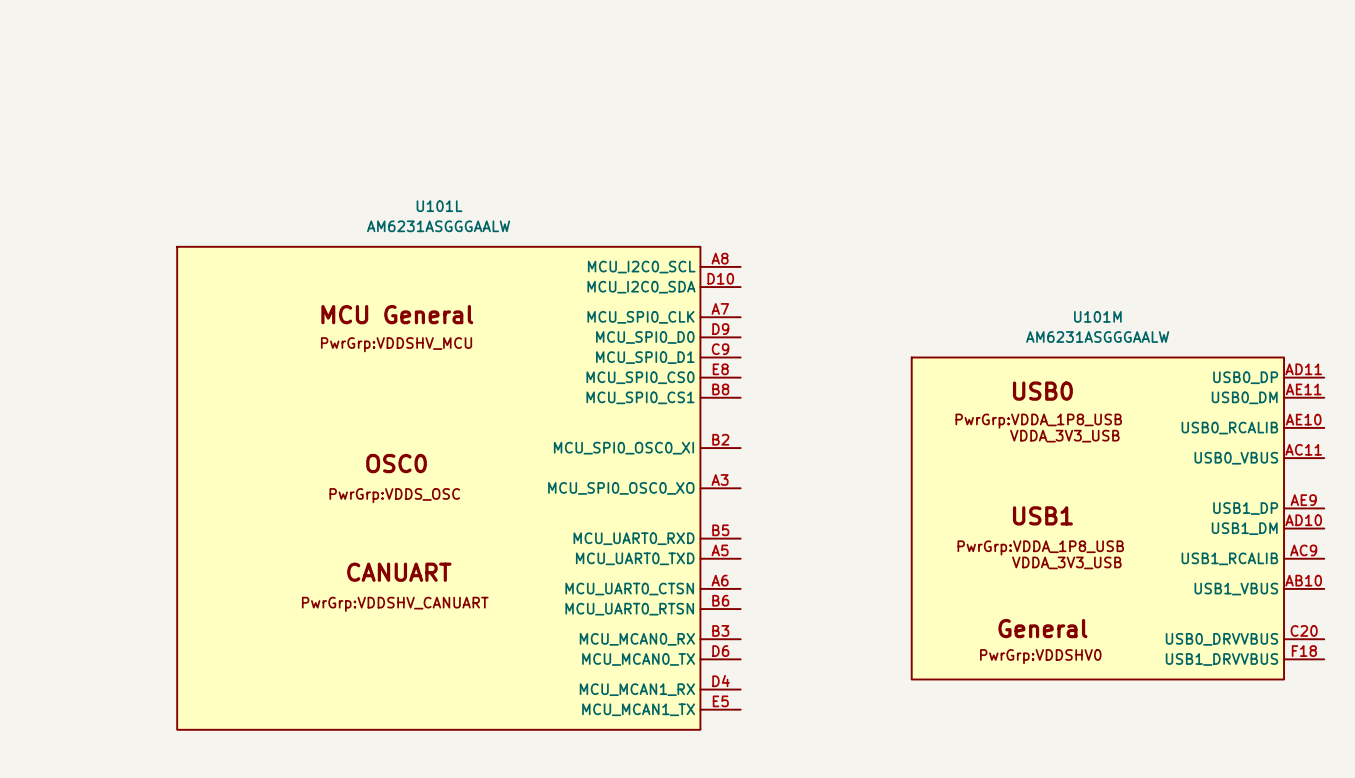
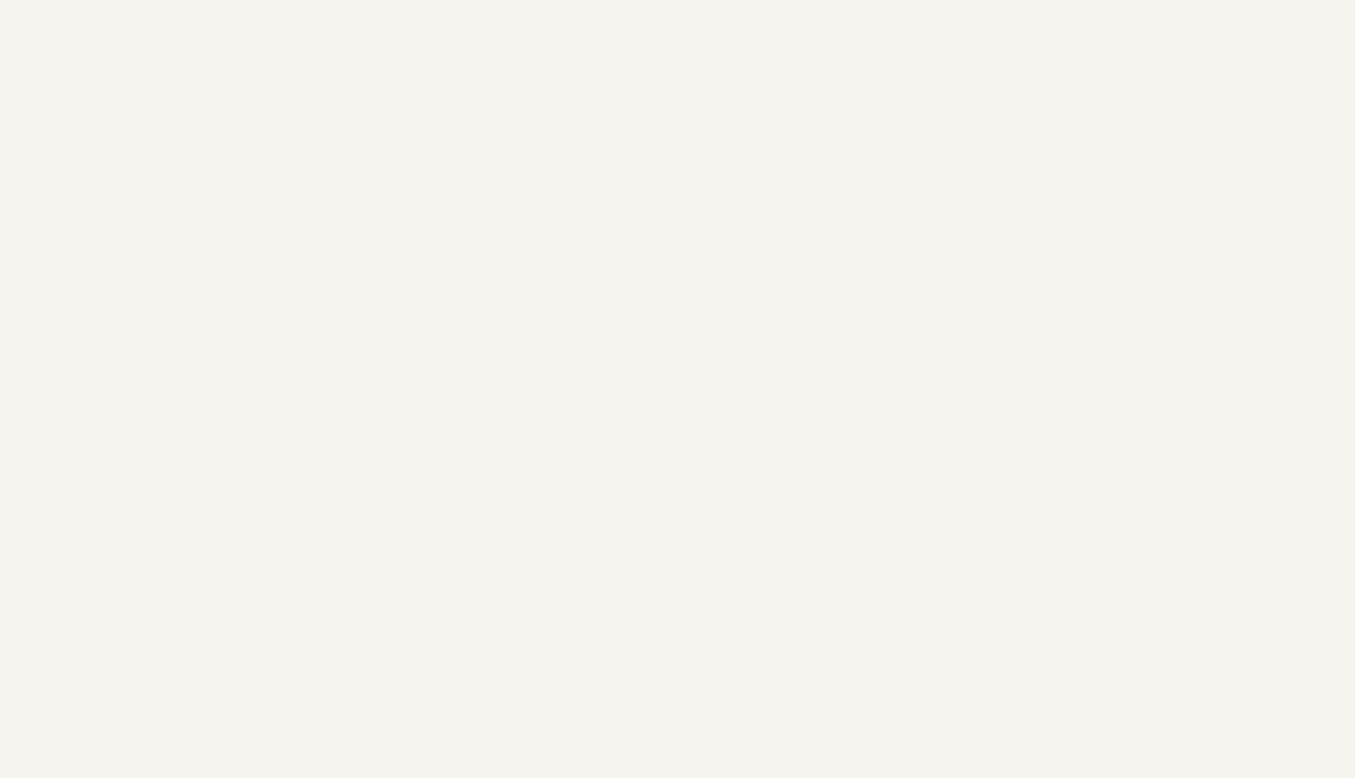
U101L: AM6231ASGGGAALW (458, 488) -> none
U101M: AM6231ASGGGAALW (1118, 518) -> none

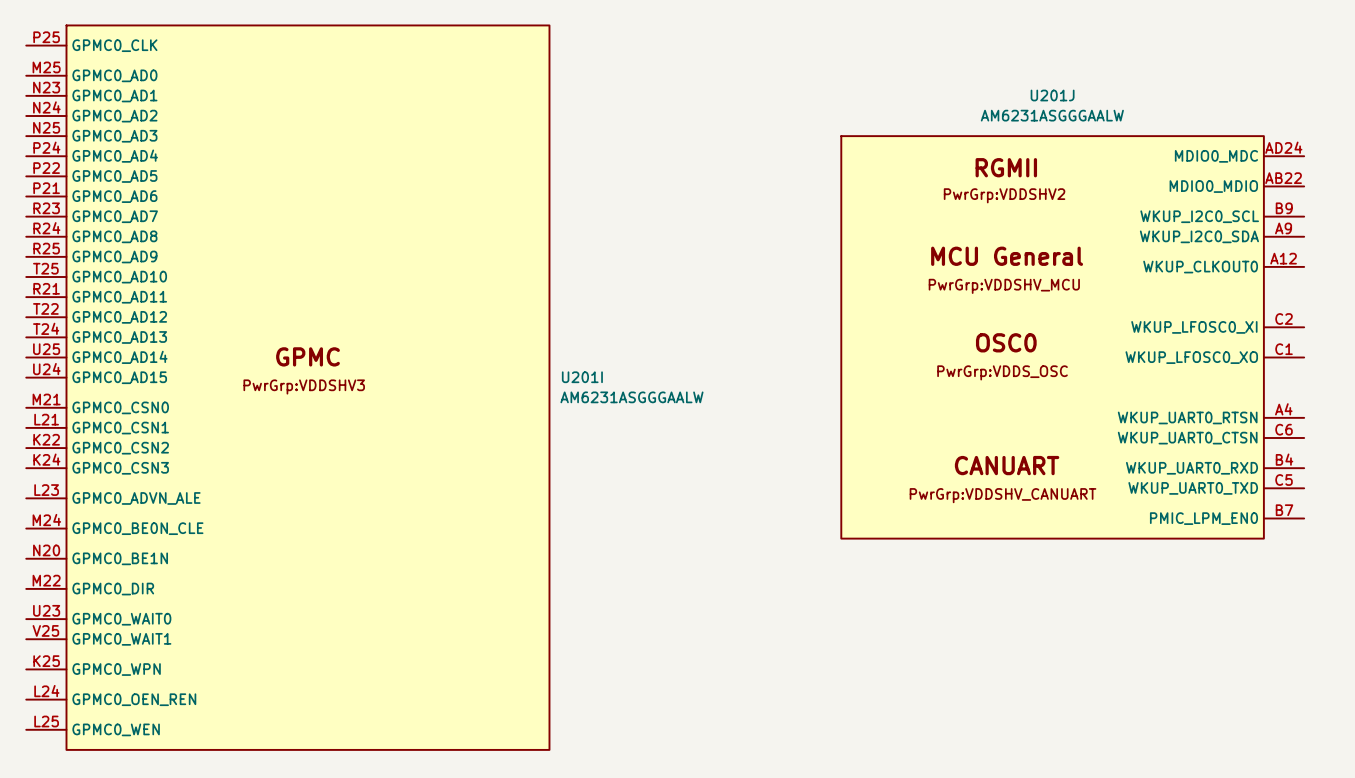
U201J: none -> AM6231ASGGGAALW (1072, 337)
U201I: none -> AM6231ASGGGAALW (287, 387)

